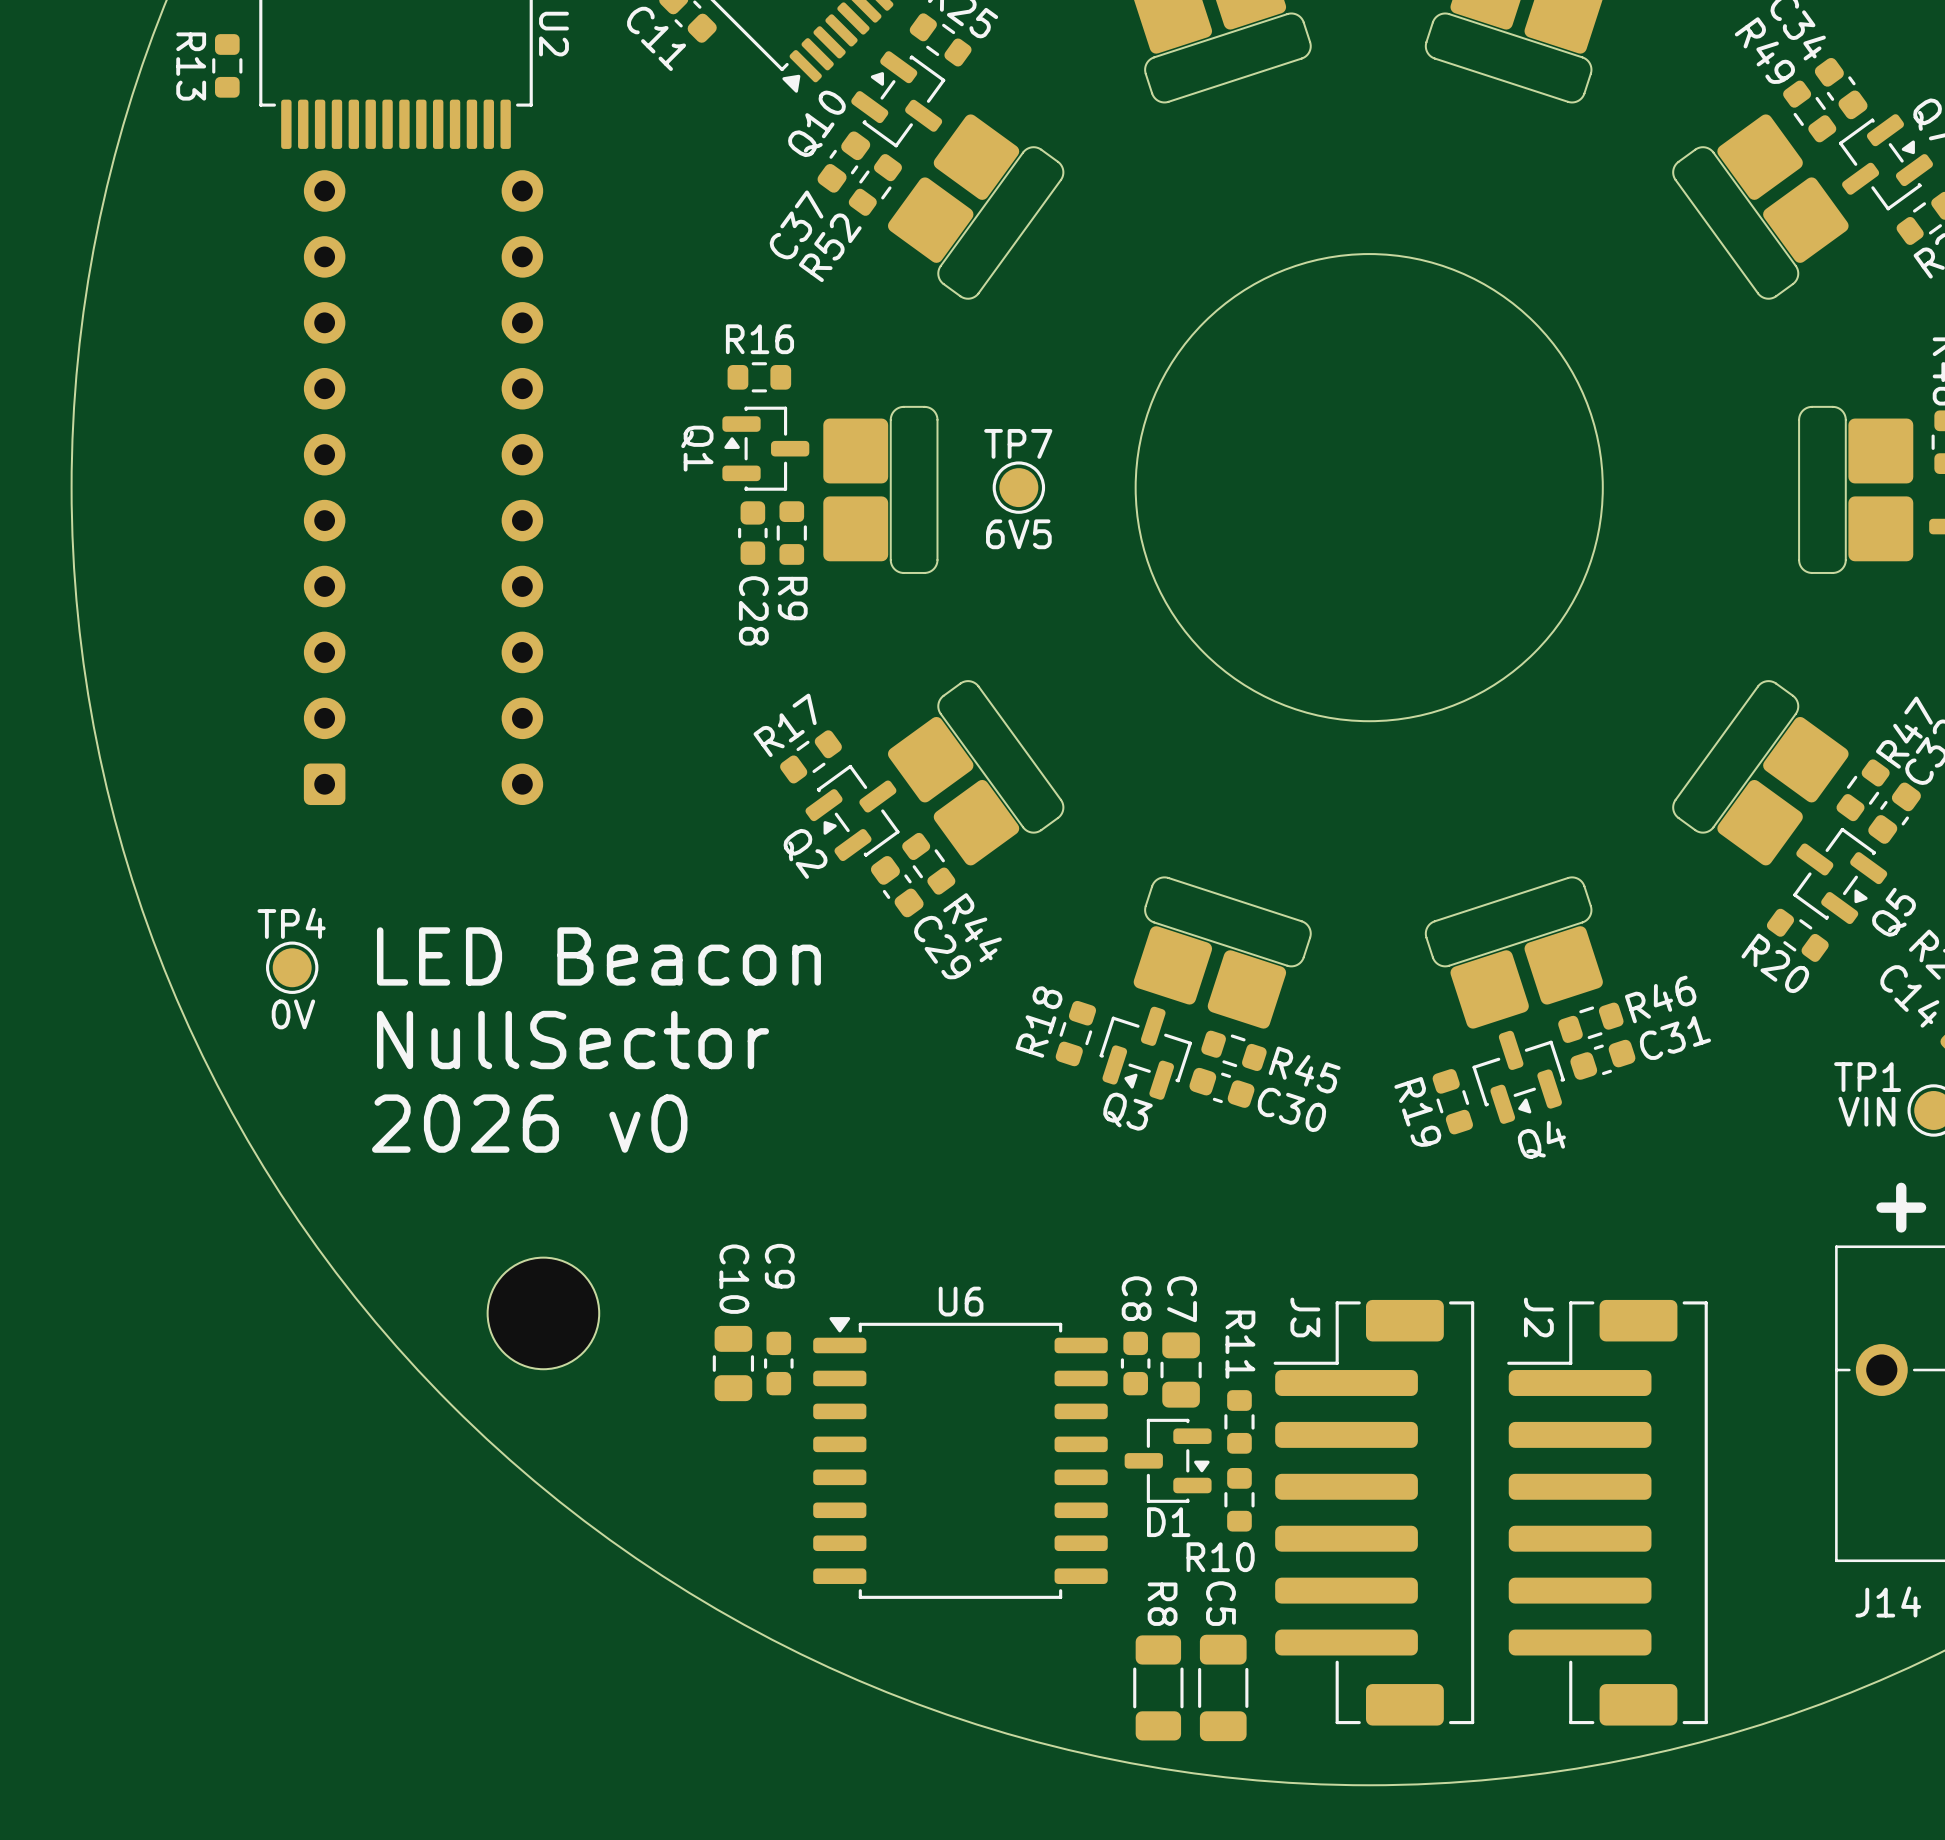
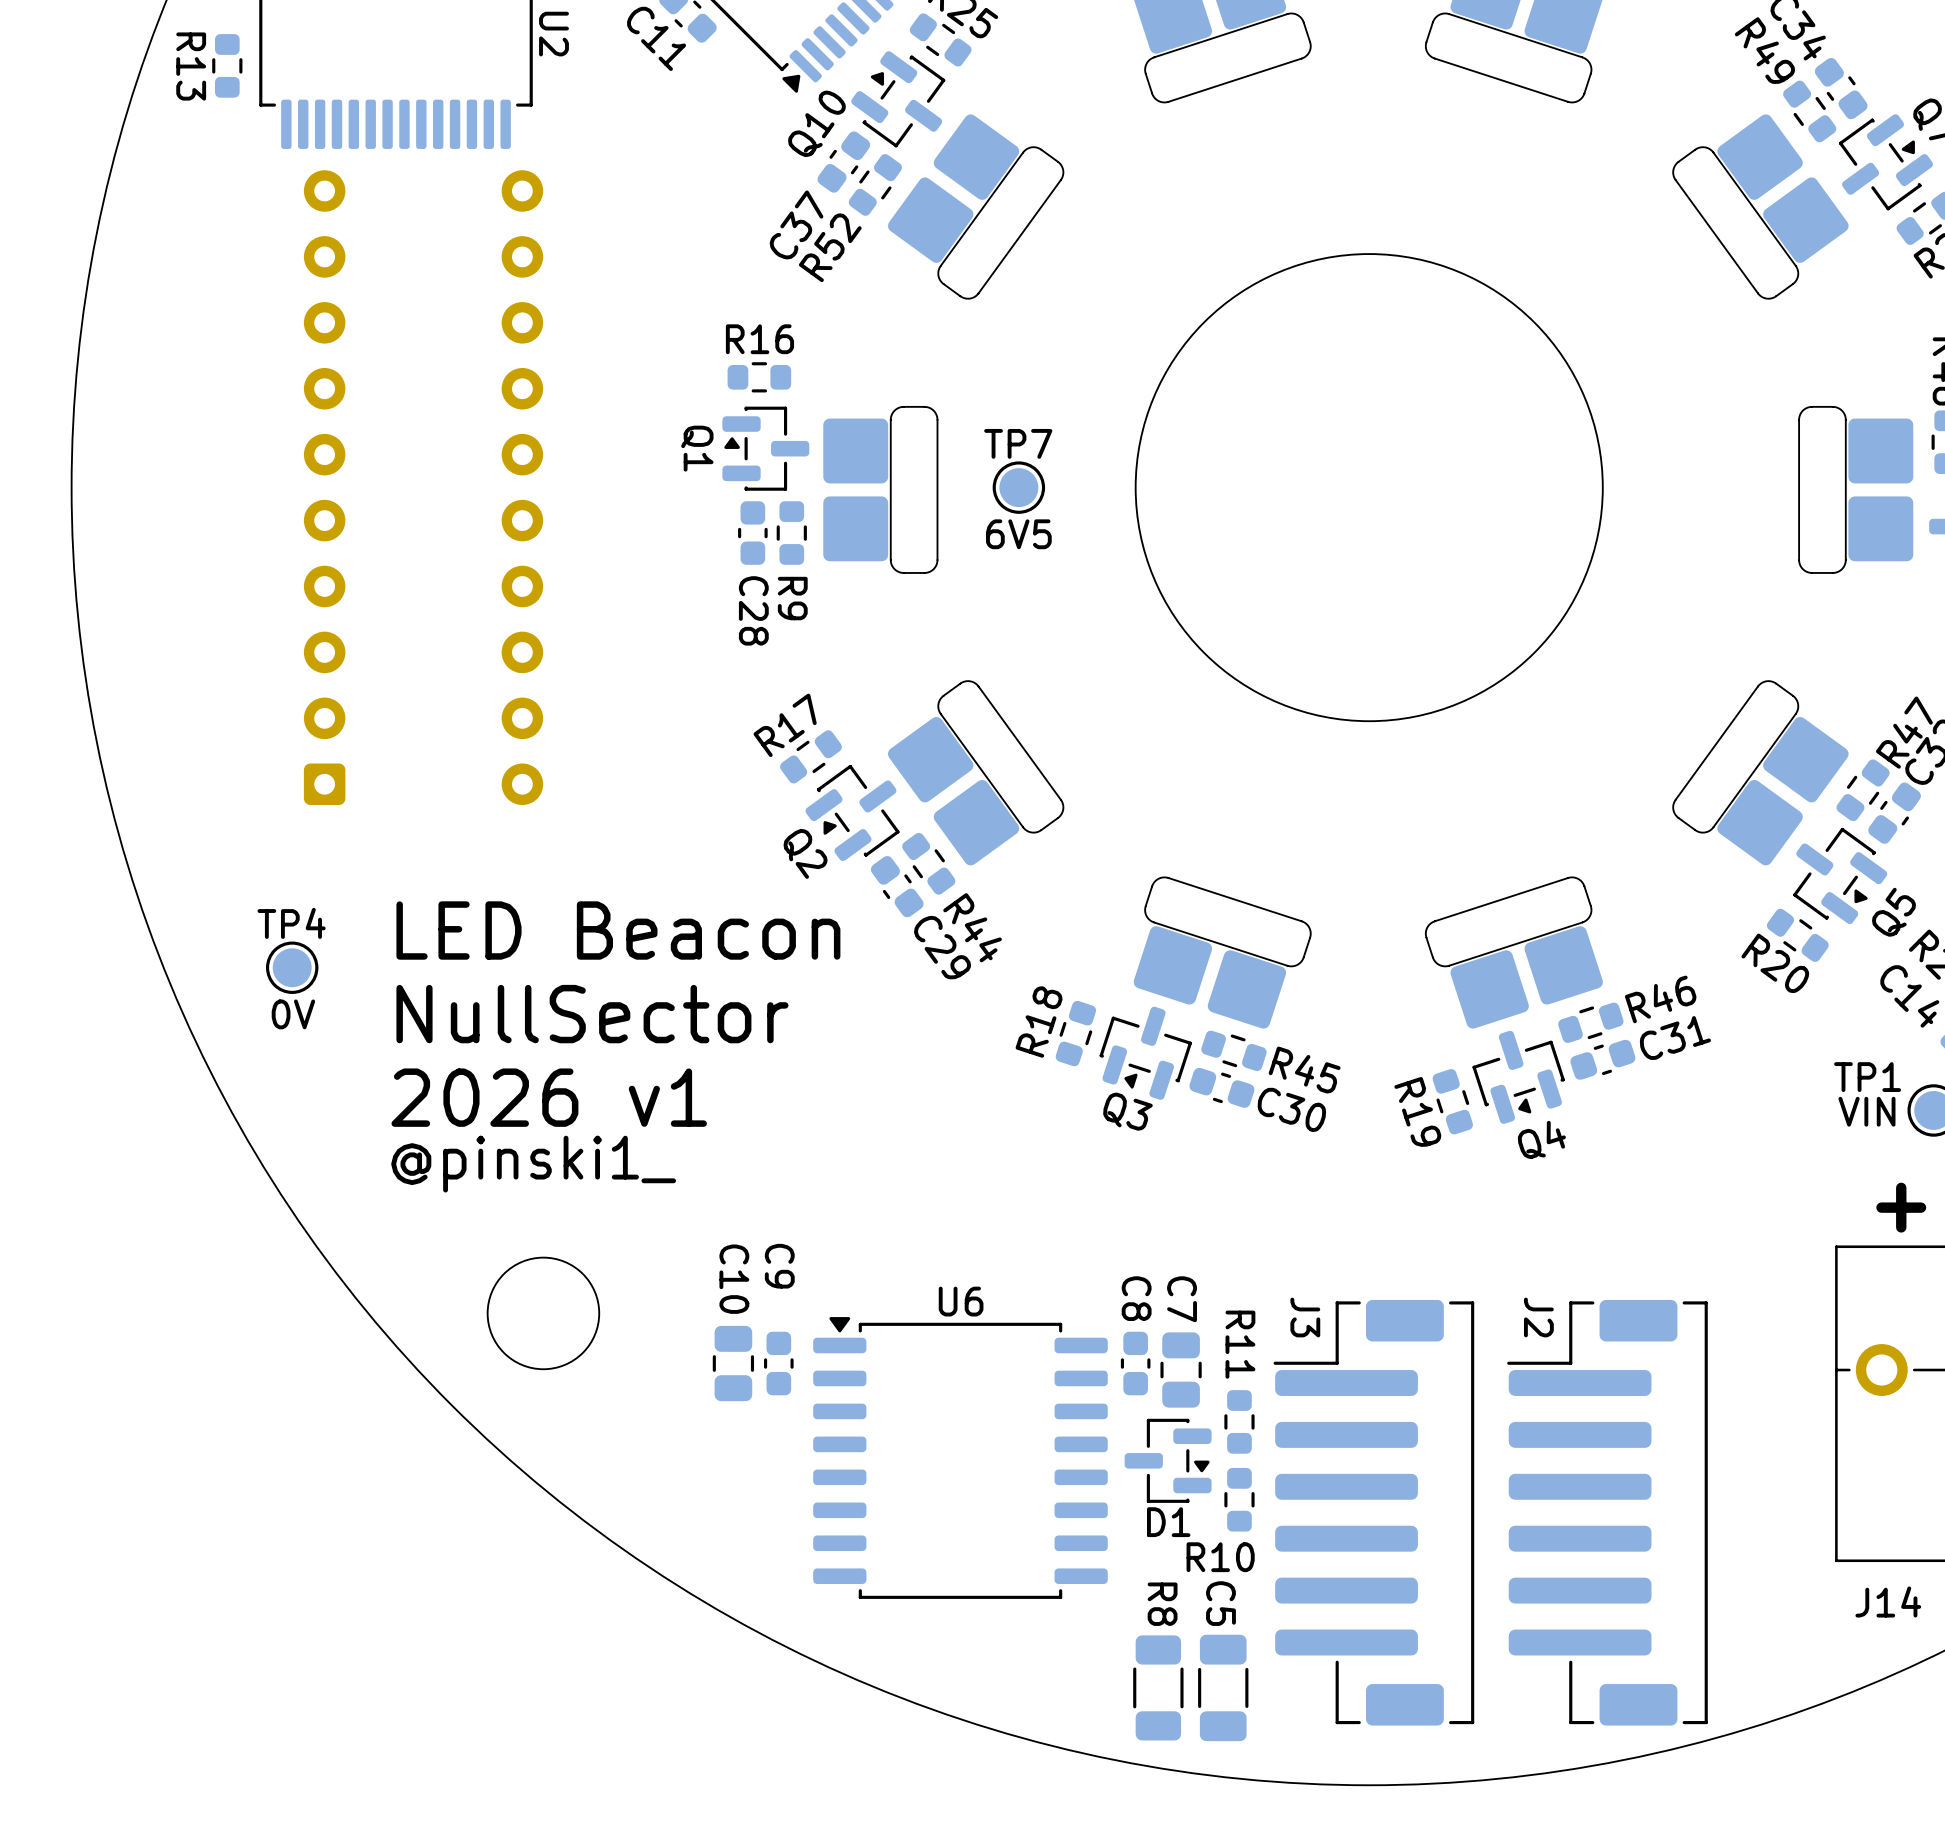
text position: LED Beacon (598, 956) -> LED Beacon (618, 930)
text position: NullSector (572, 1040) -> NullSector (592, 1014)
text: 2026 v0 (529, 1123) -> 2026 v1 (549, 1097)
text: none -> @pinski1_ (533, 1164)

